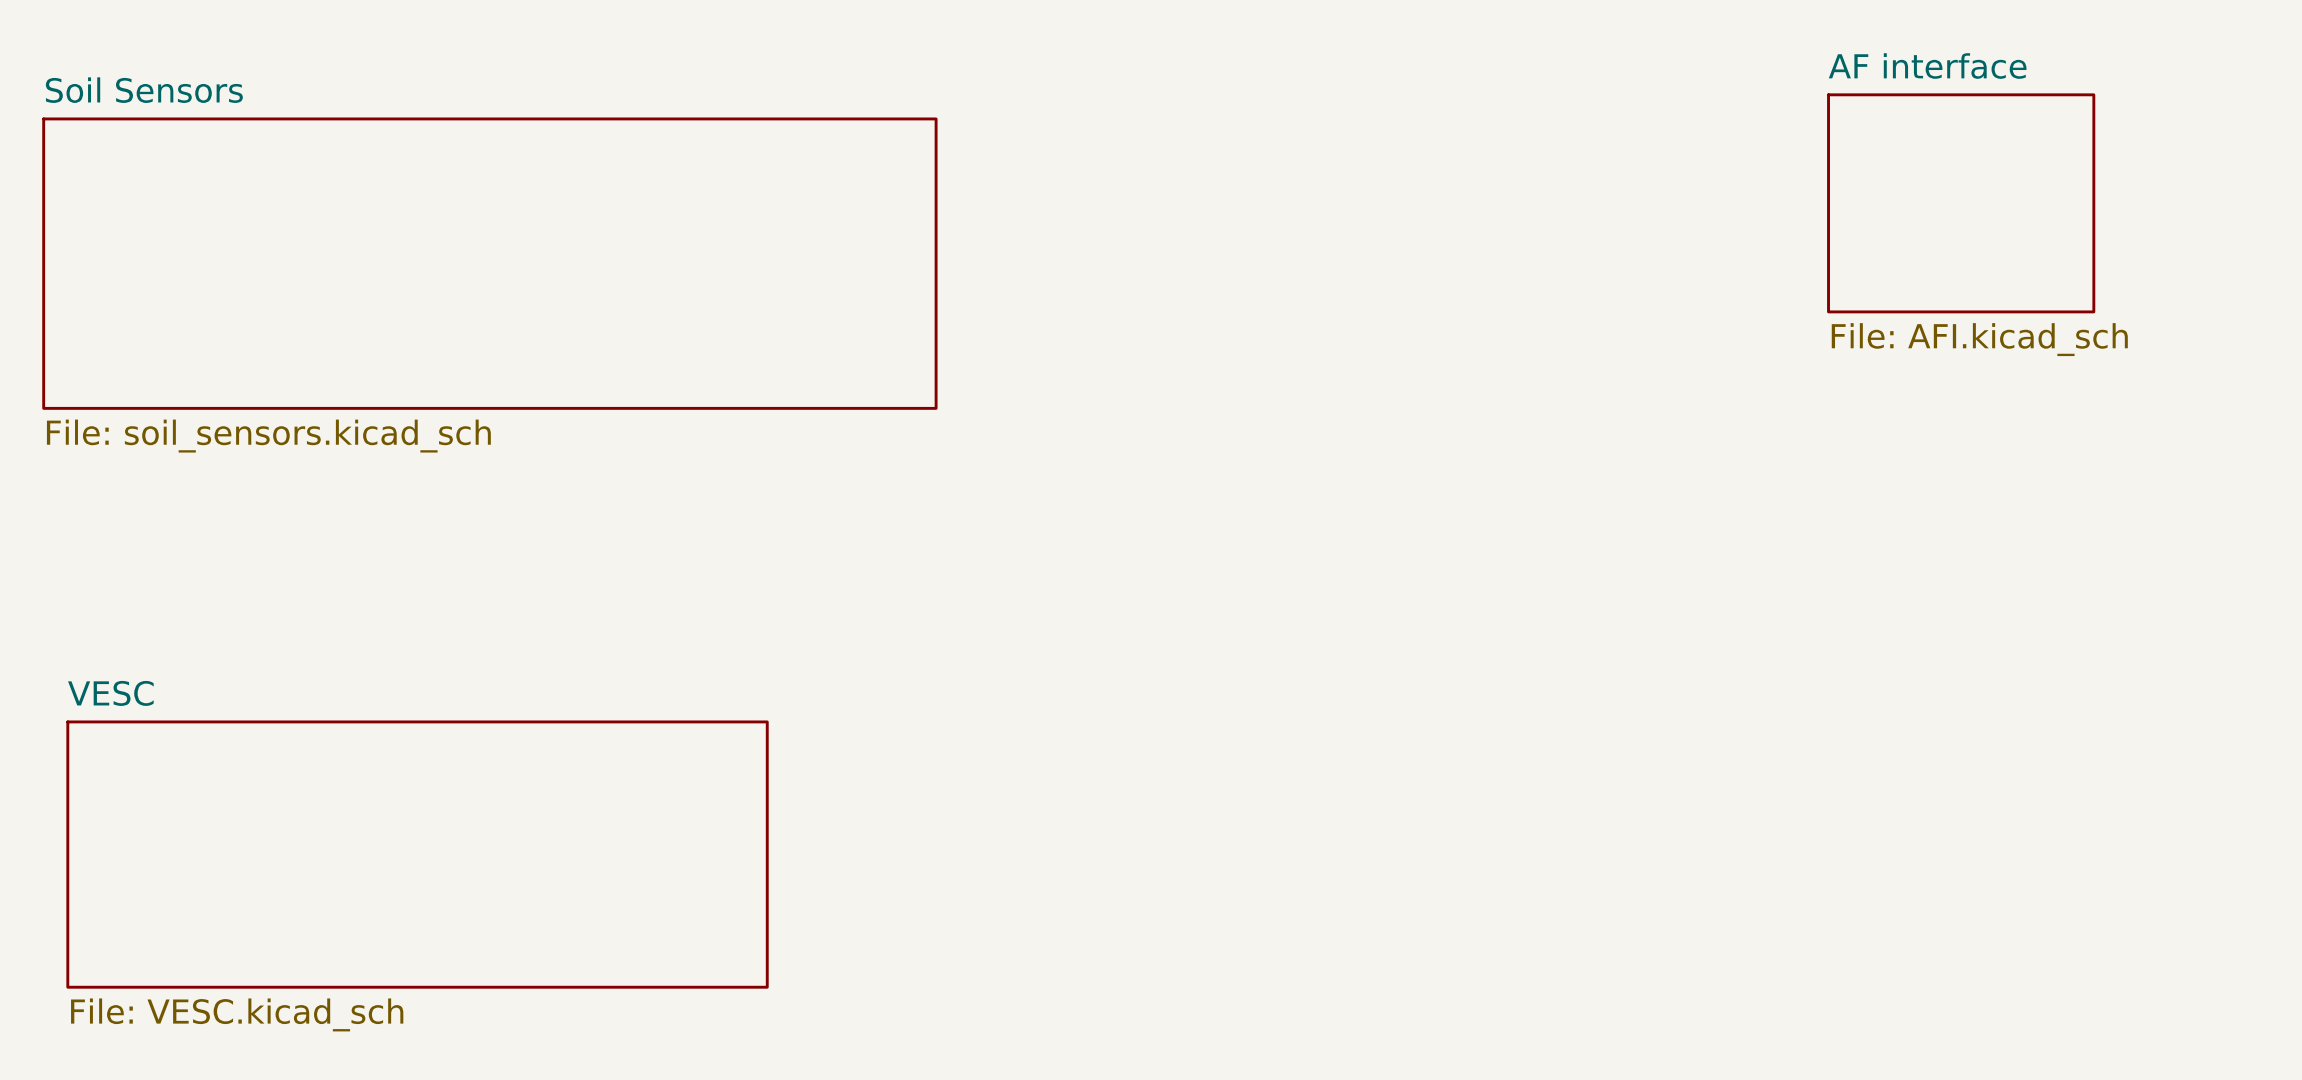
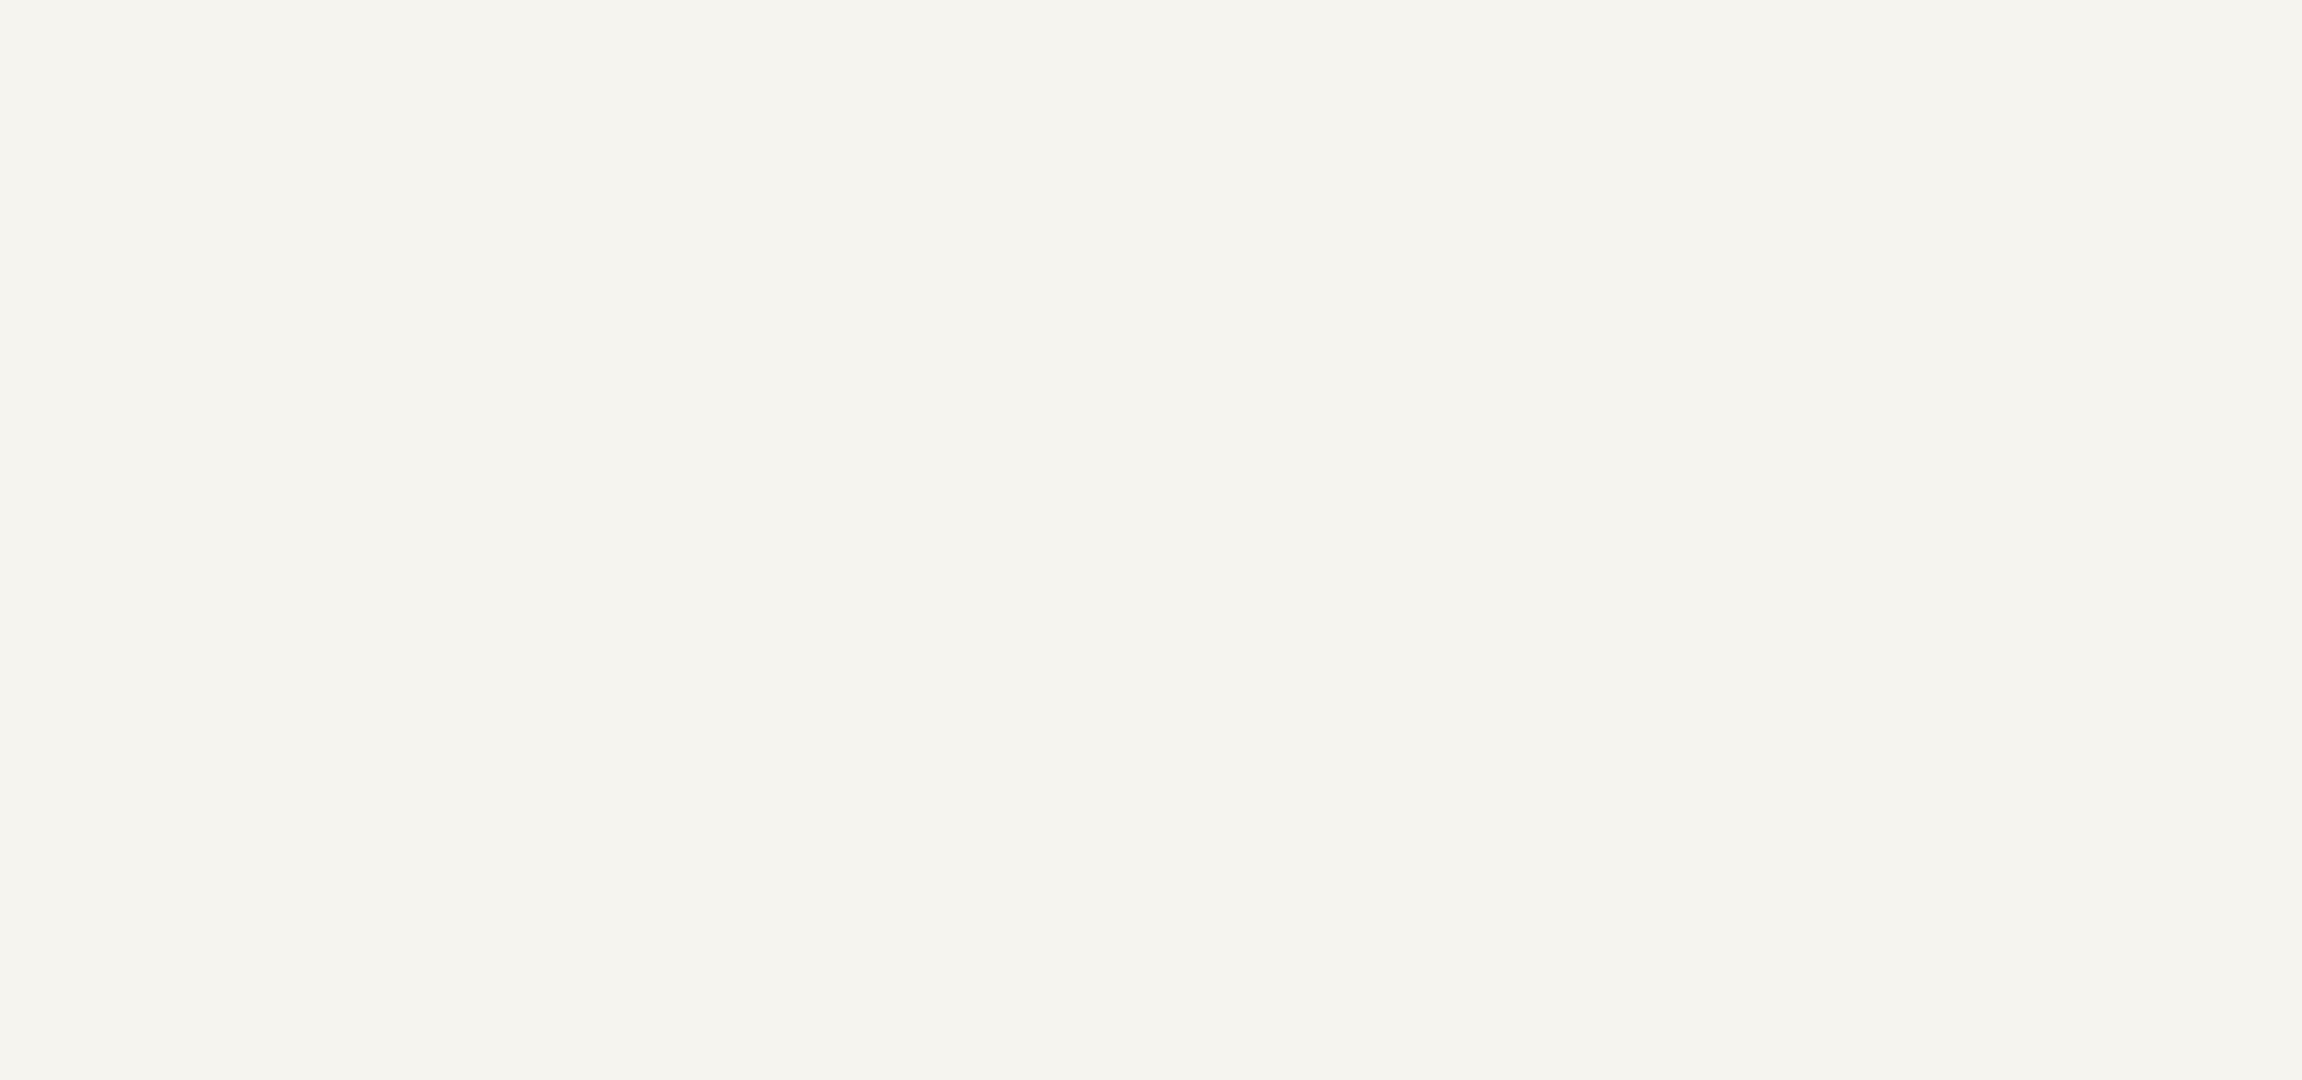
sheet AF interface: File: AFI.kicad_sch (1961, 203) -> none
sheet Soil Sensors: File: soil_sensors.kicad_sch (489, 263) -> none
sheet VESC: File: VESC.kicad_sch (417, 854) -> none

